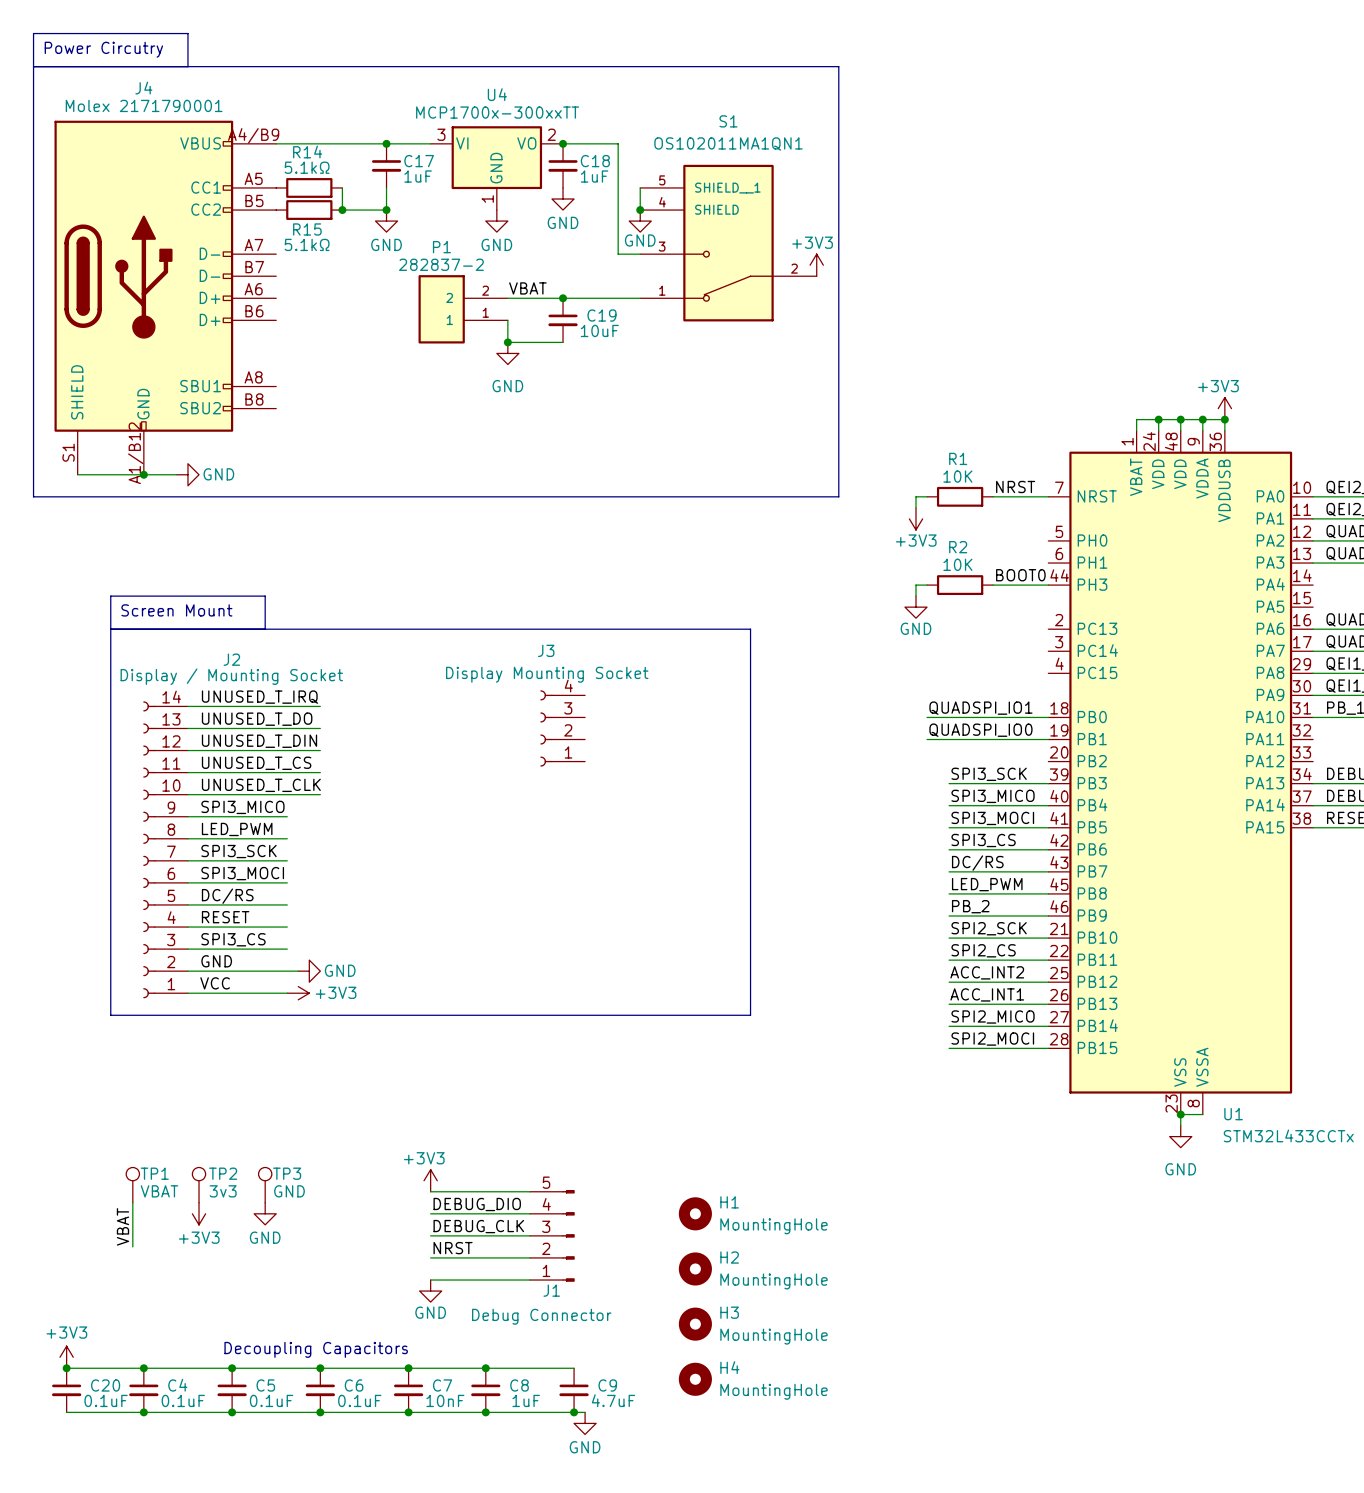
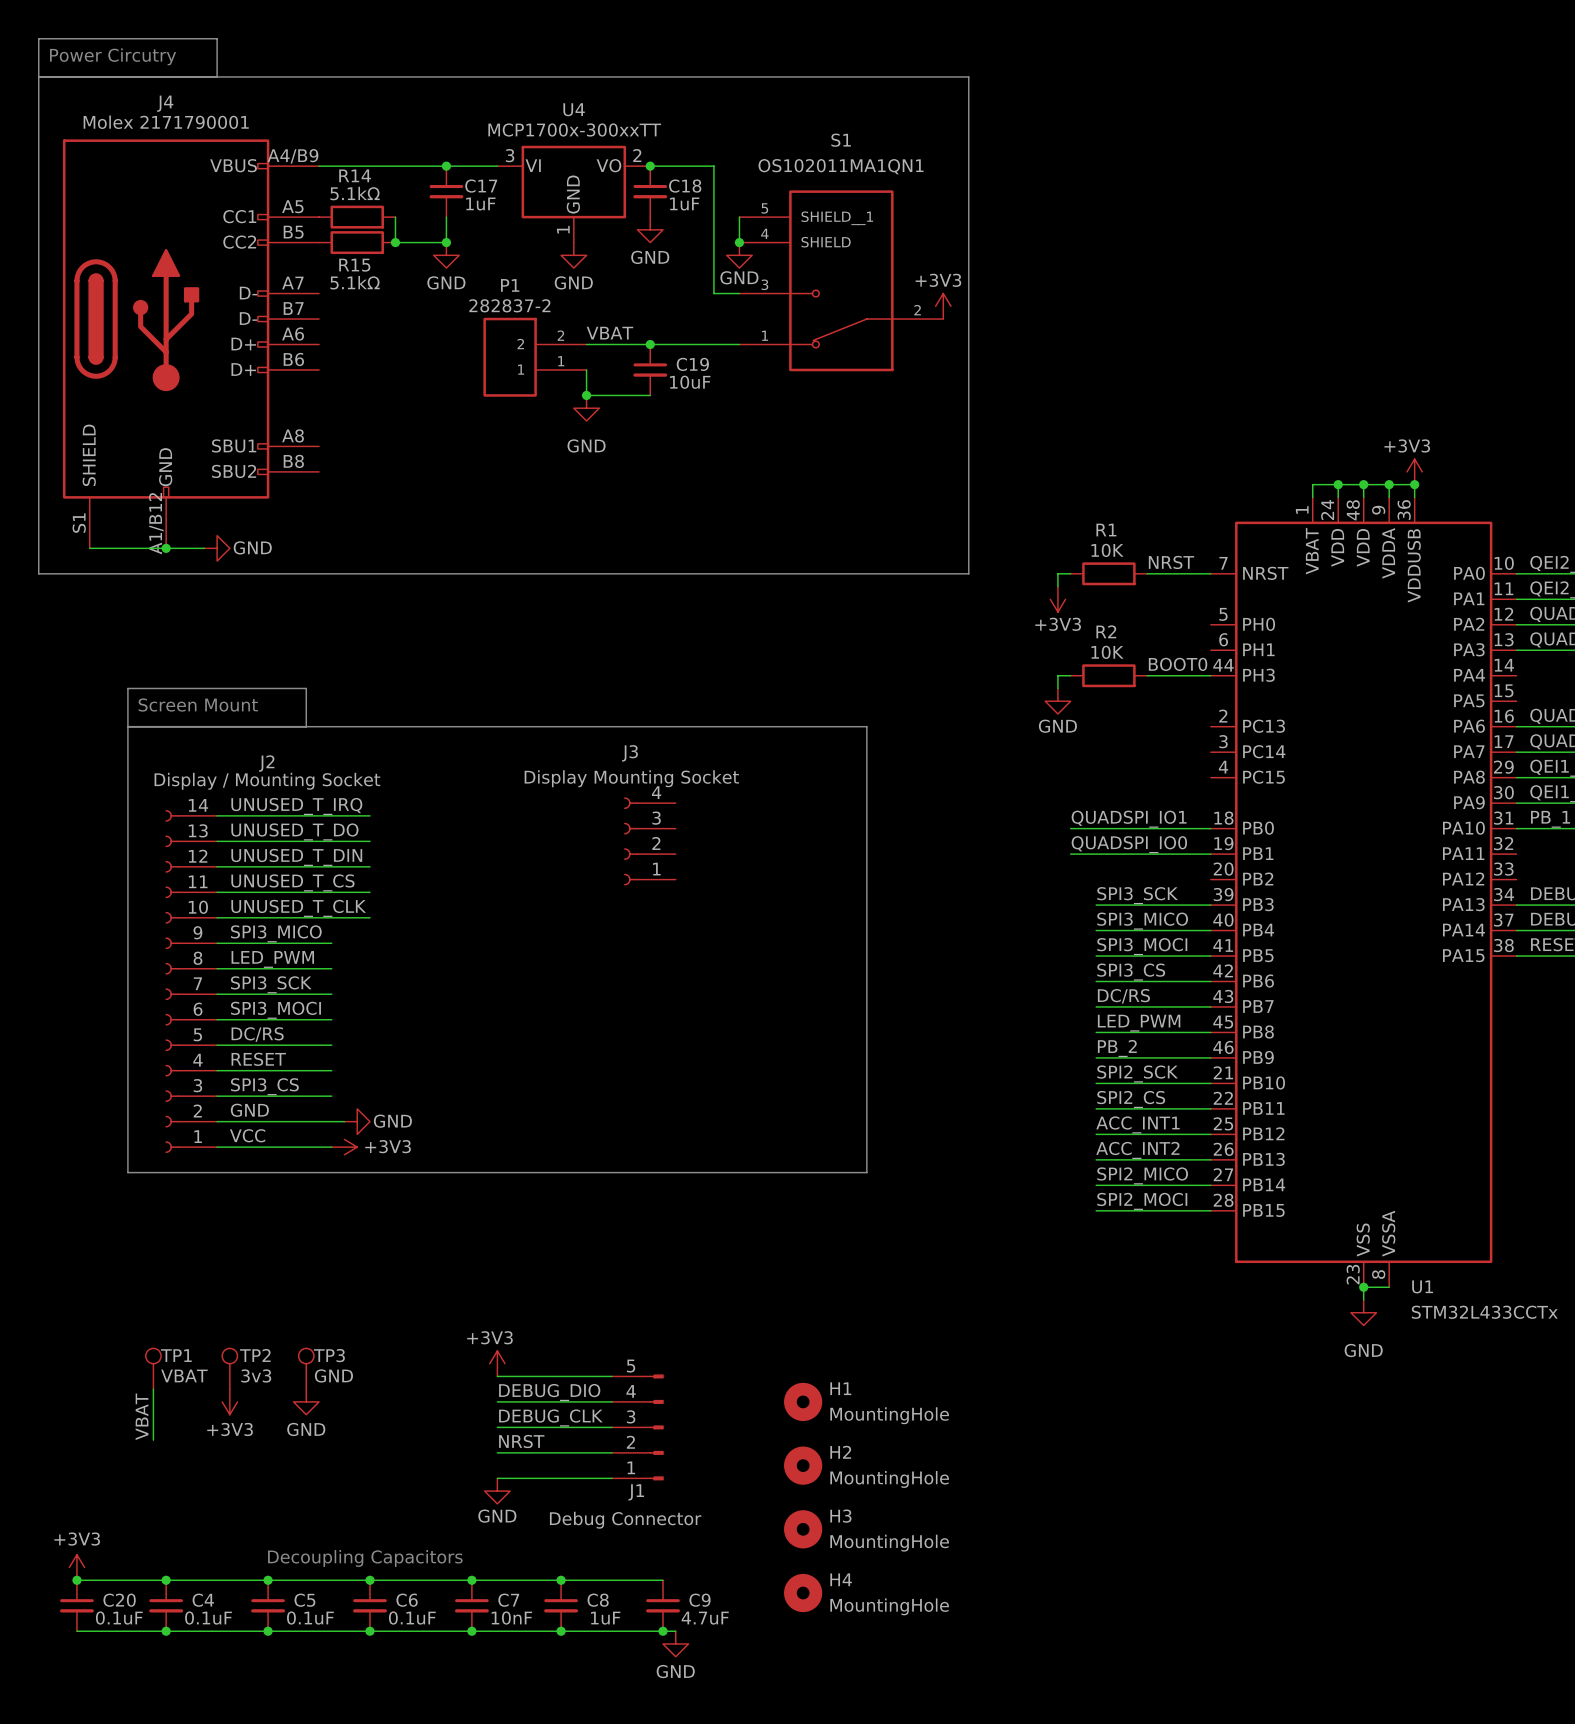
label: ACC_INT2 (987, 972) -> ACC_INT1 (1137, 1124)
label: ACC_INT1 (987, 994) -> ACC_INT2 (1137, 1150)

